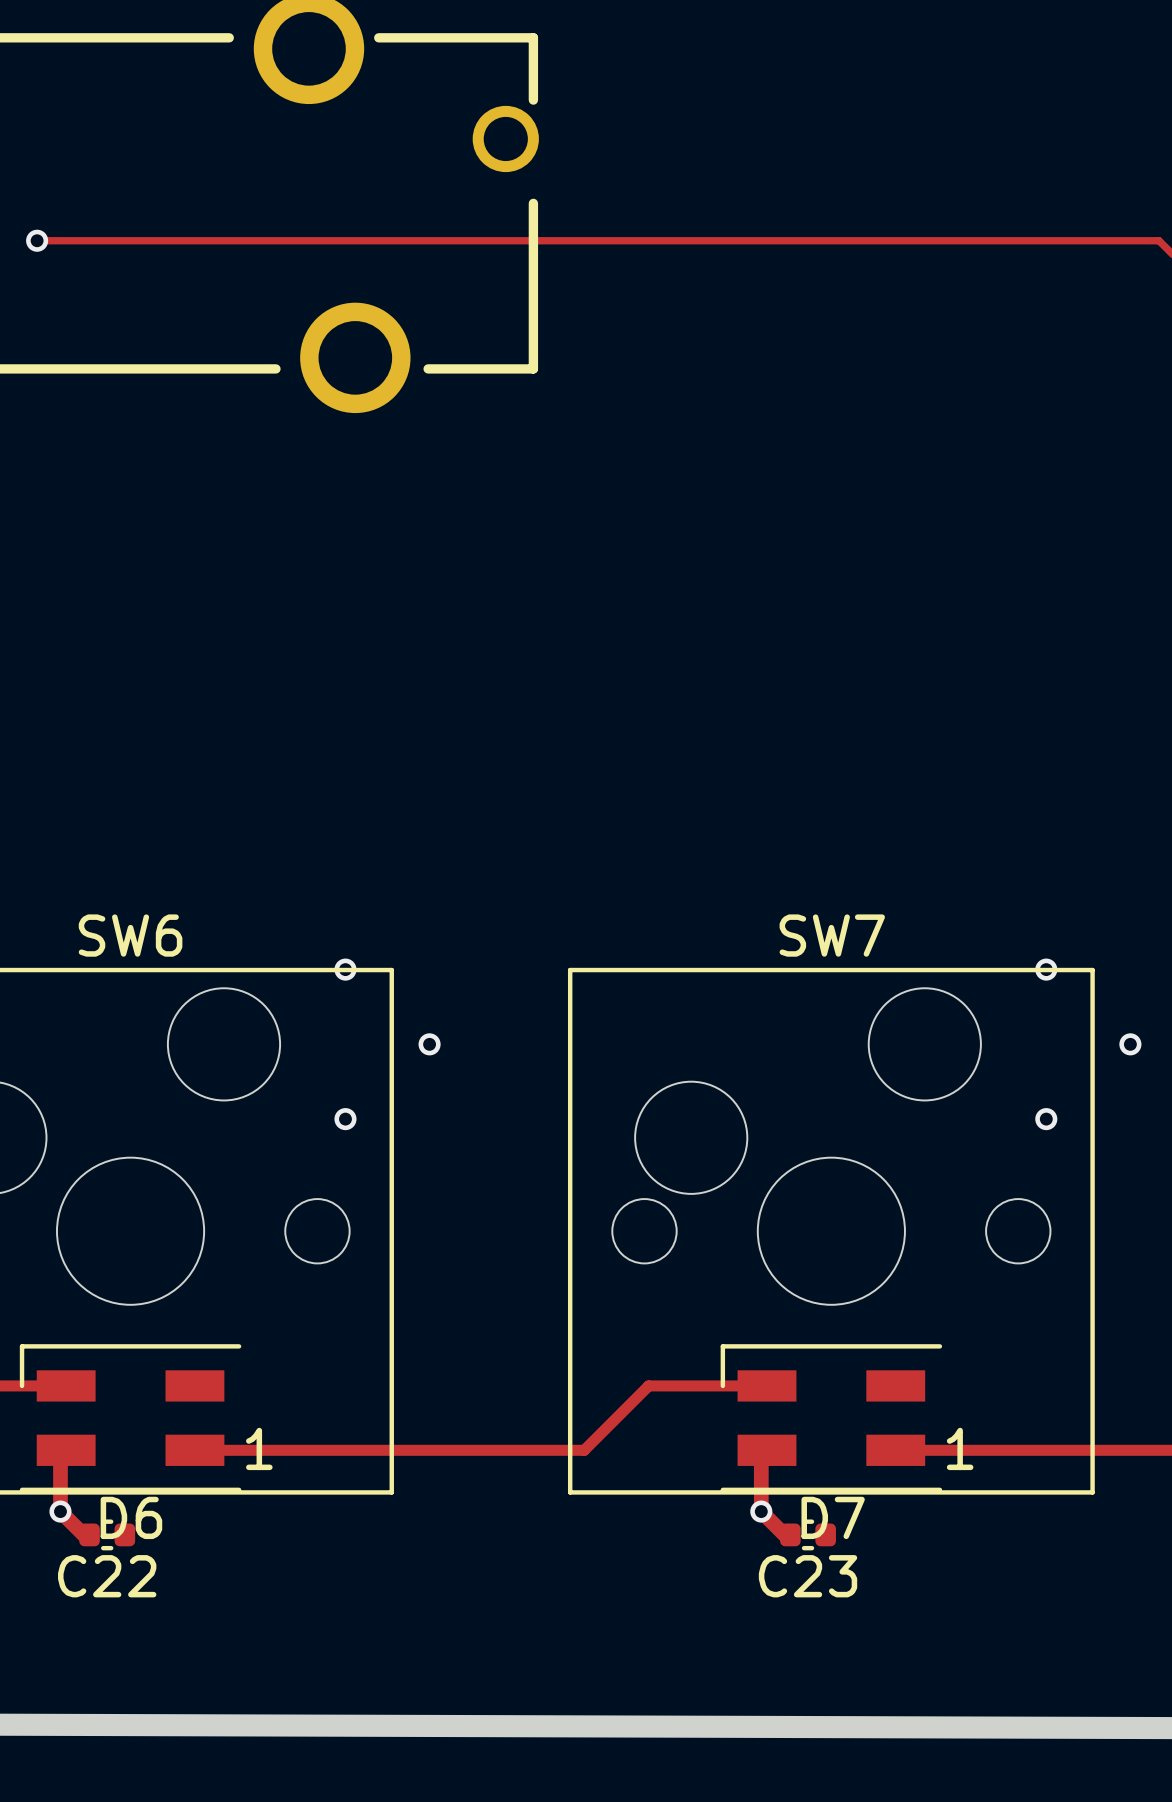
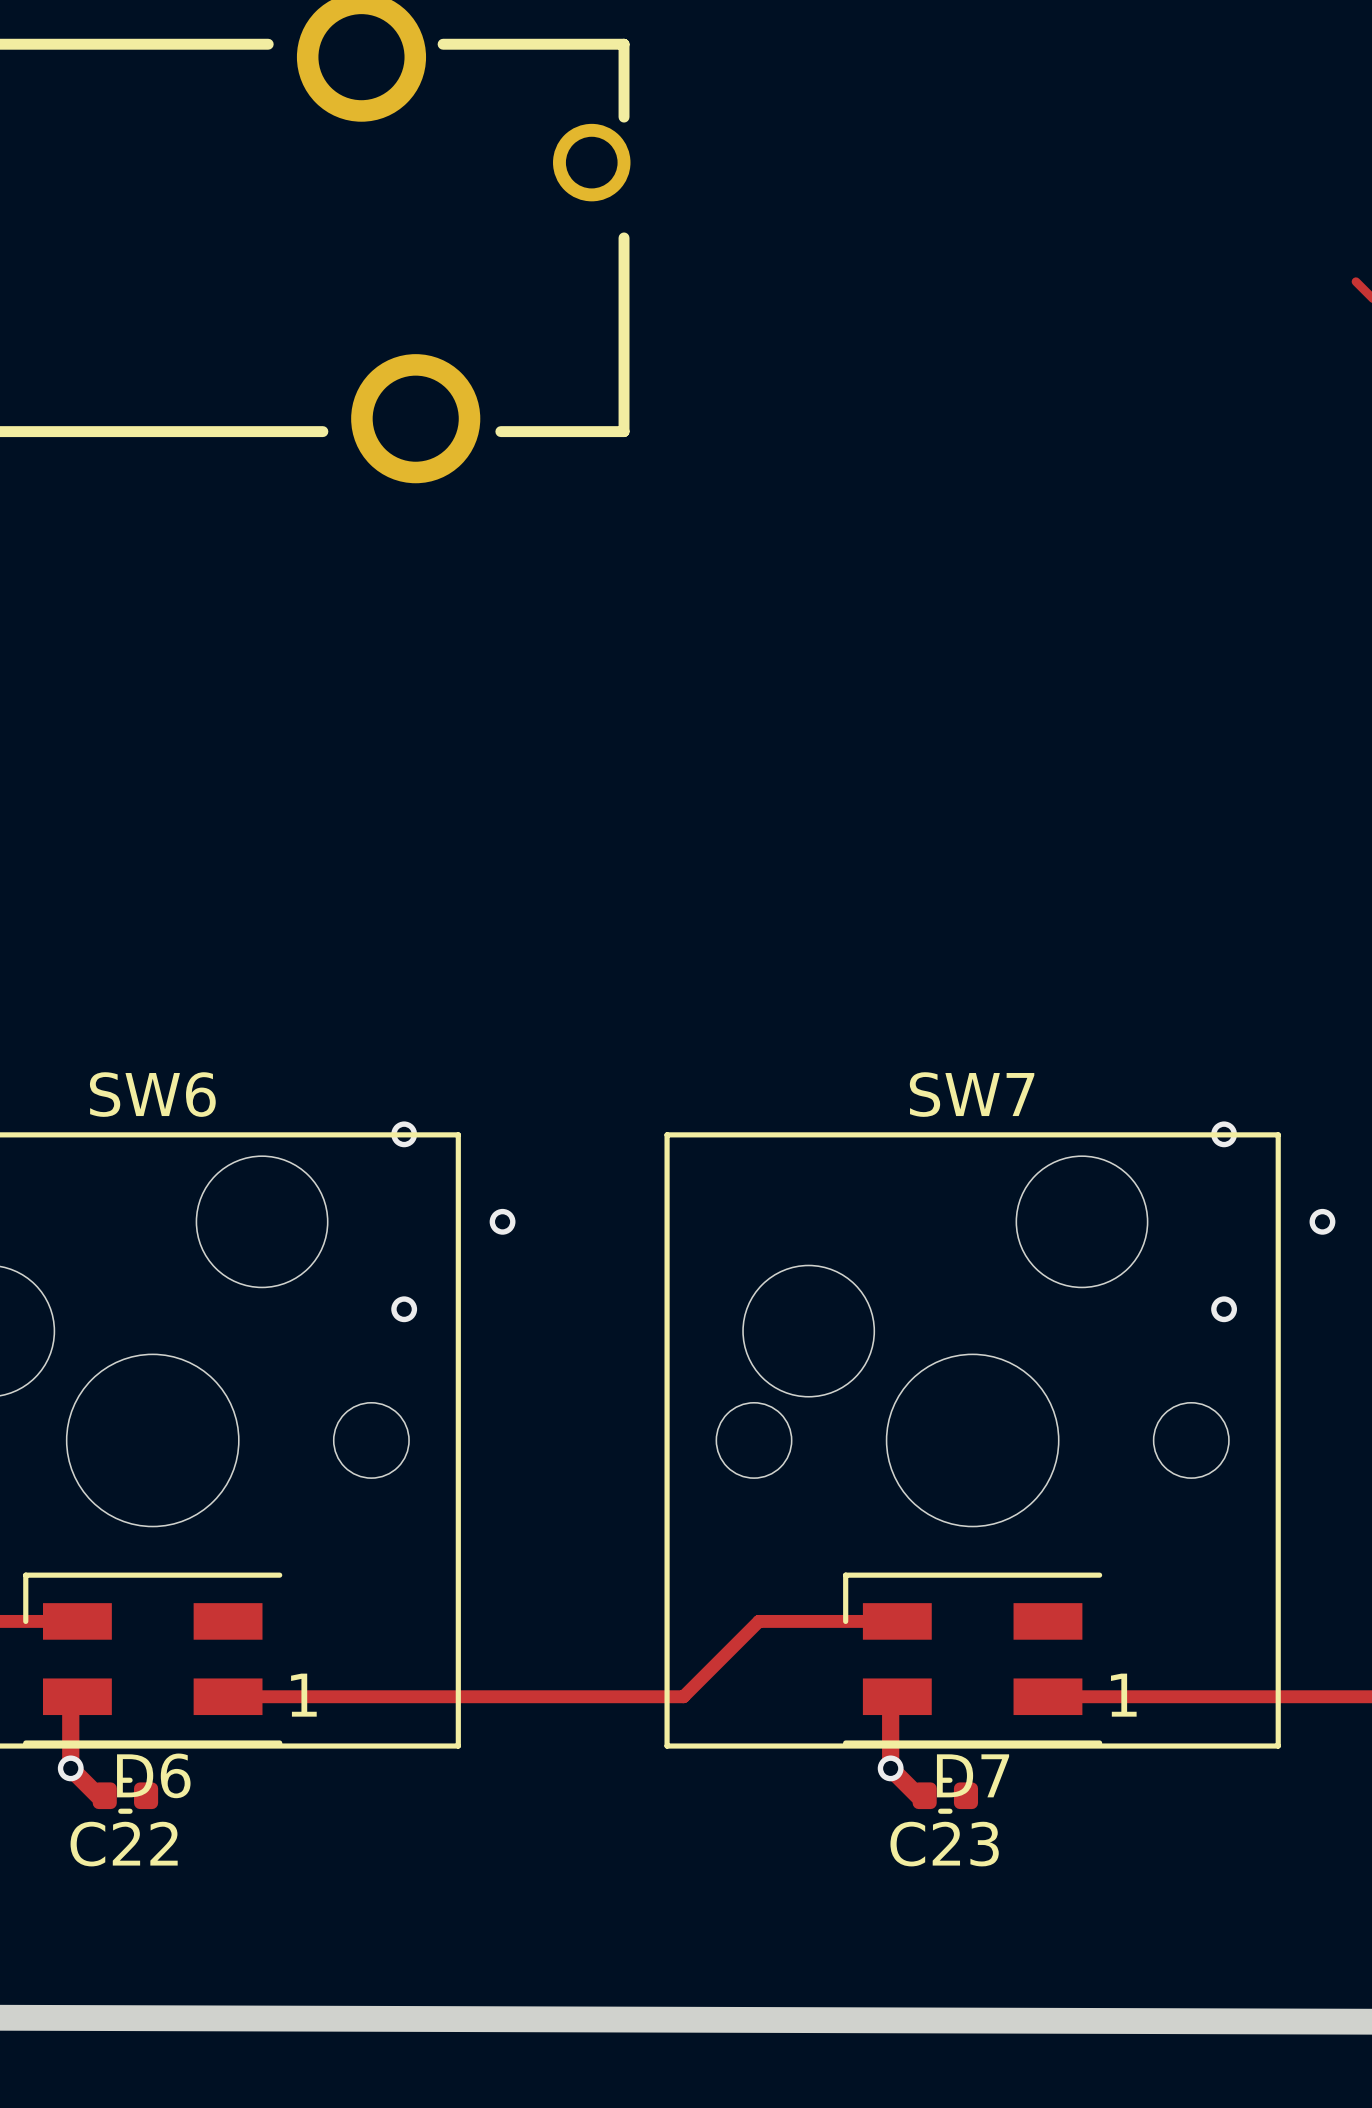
track: (37, 240) (1159, 240) -> none
via: (37, 240) -> none

